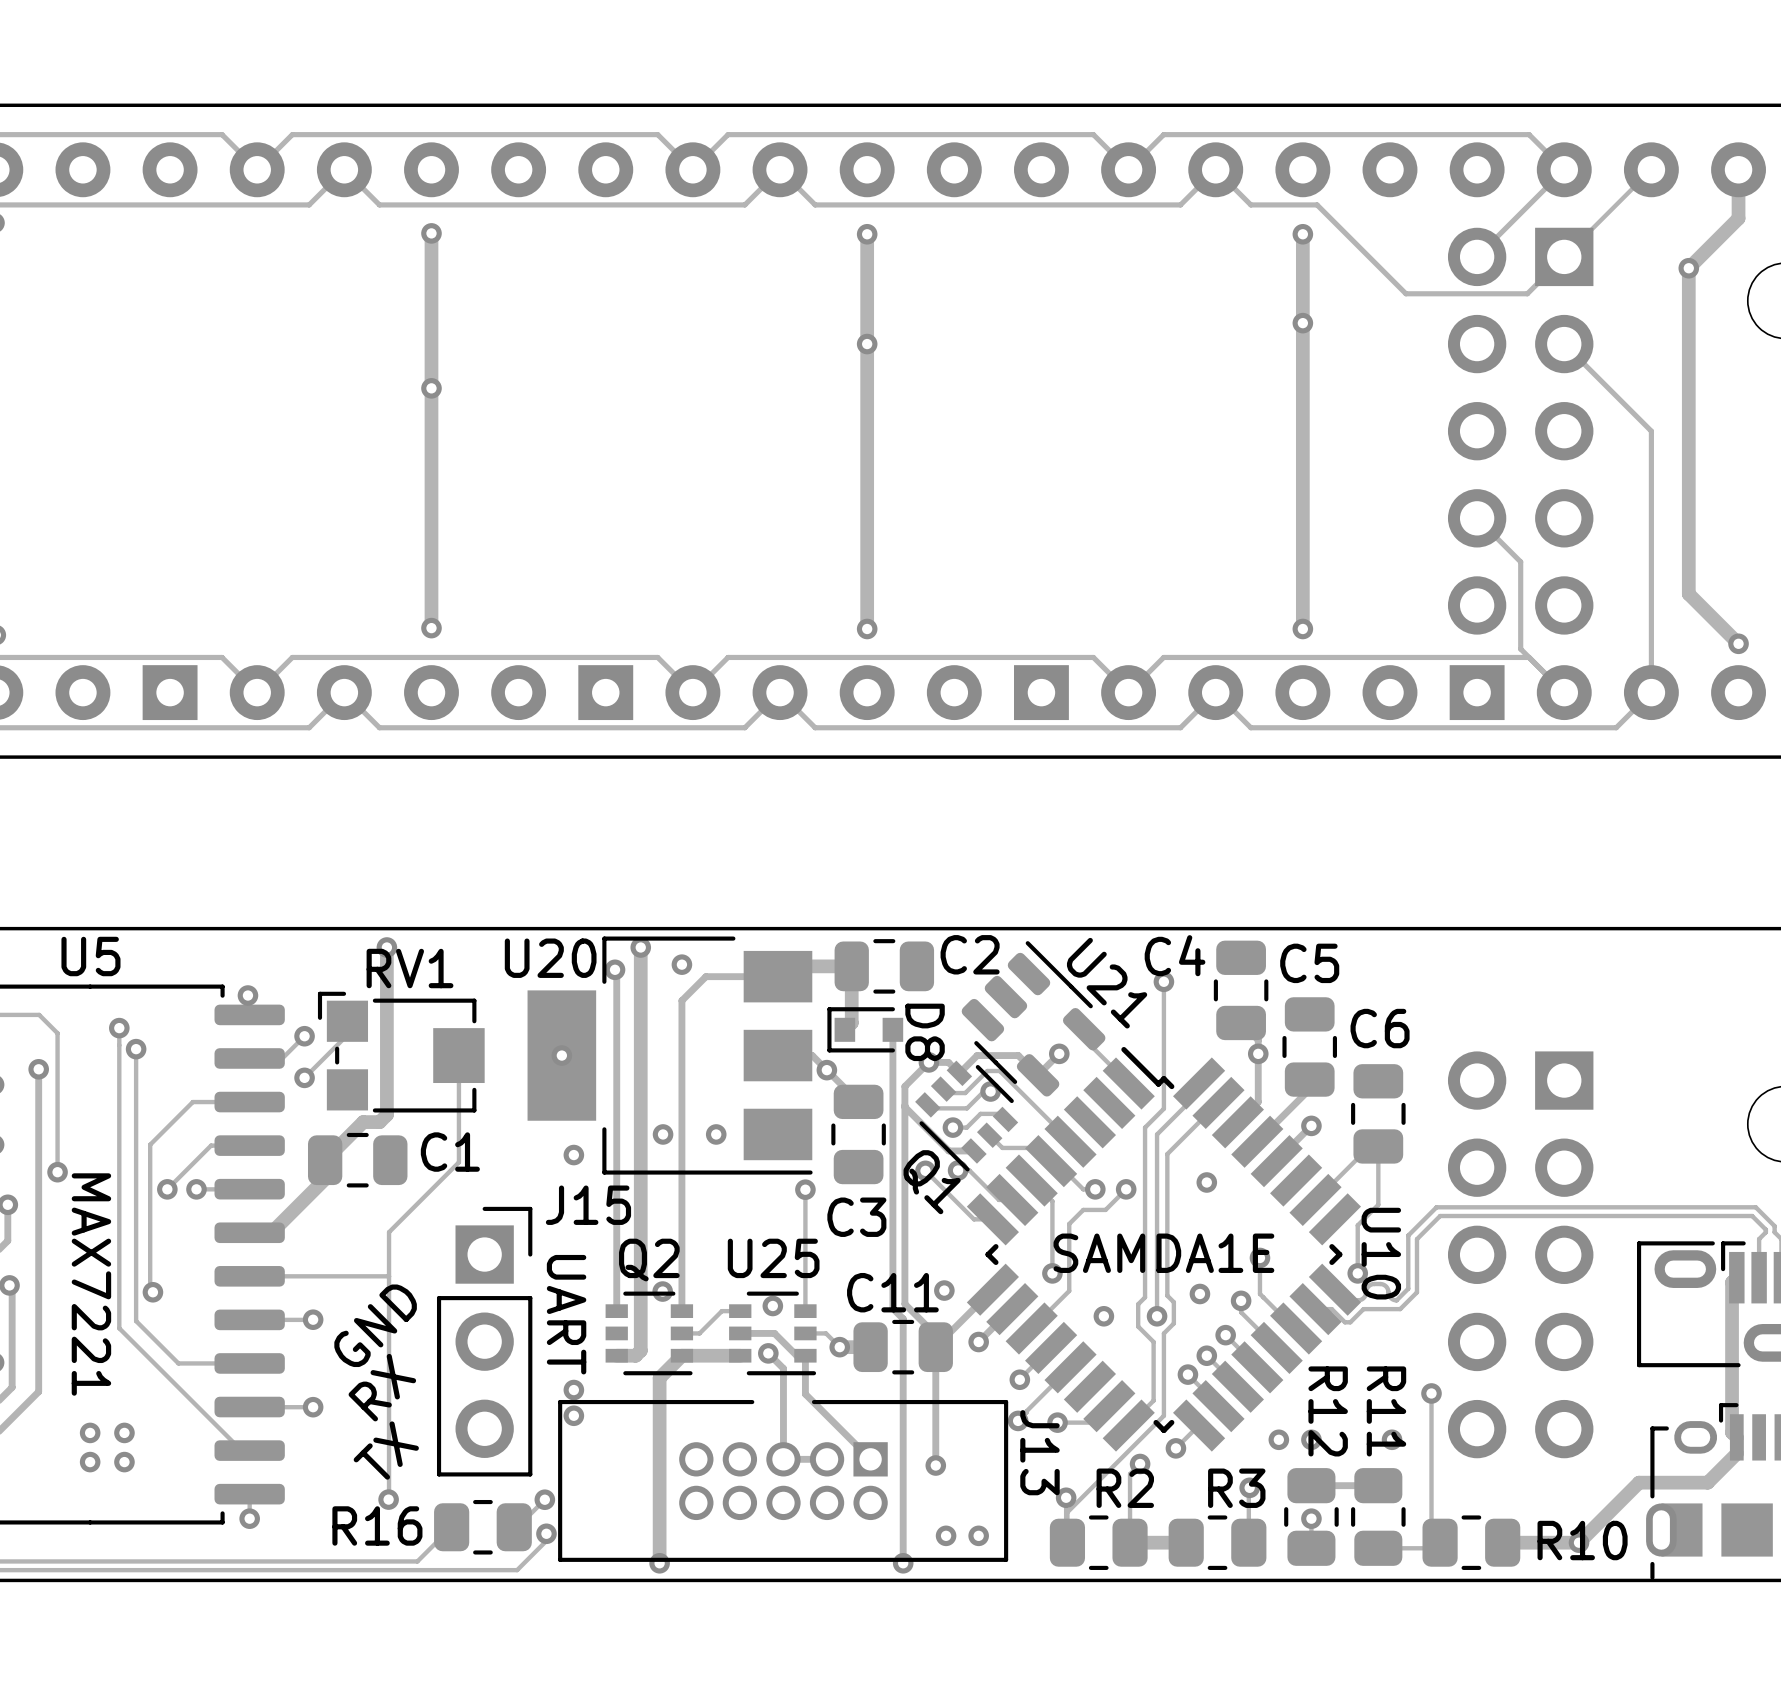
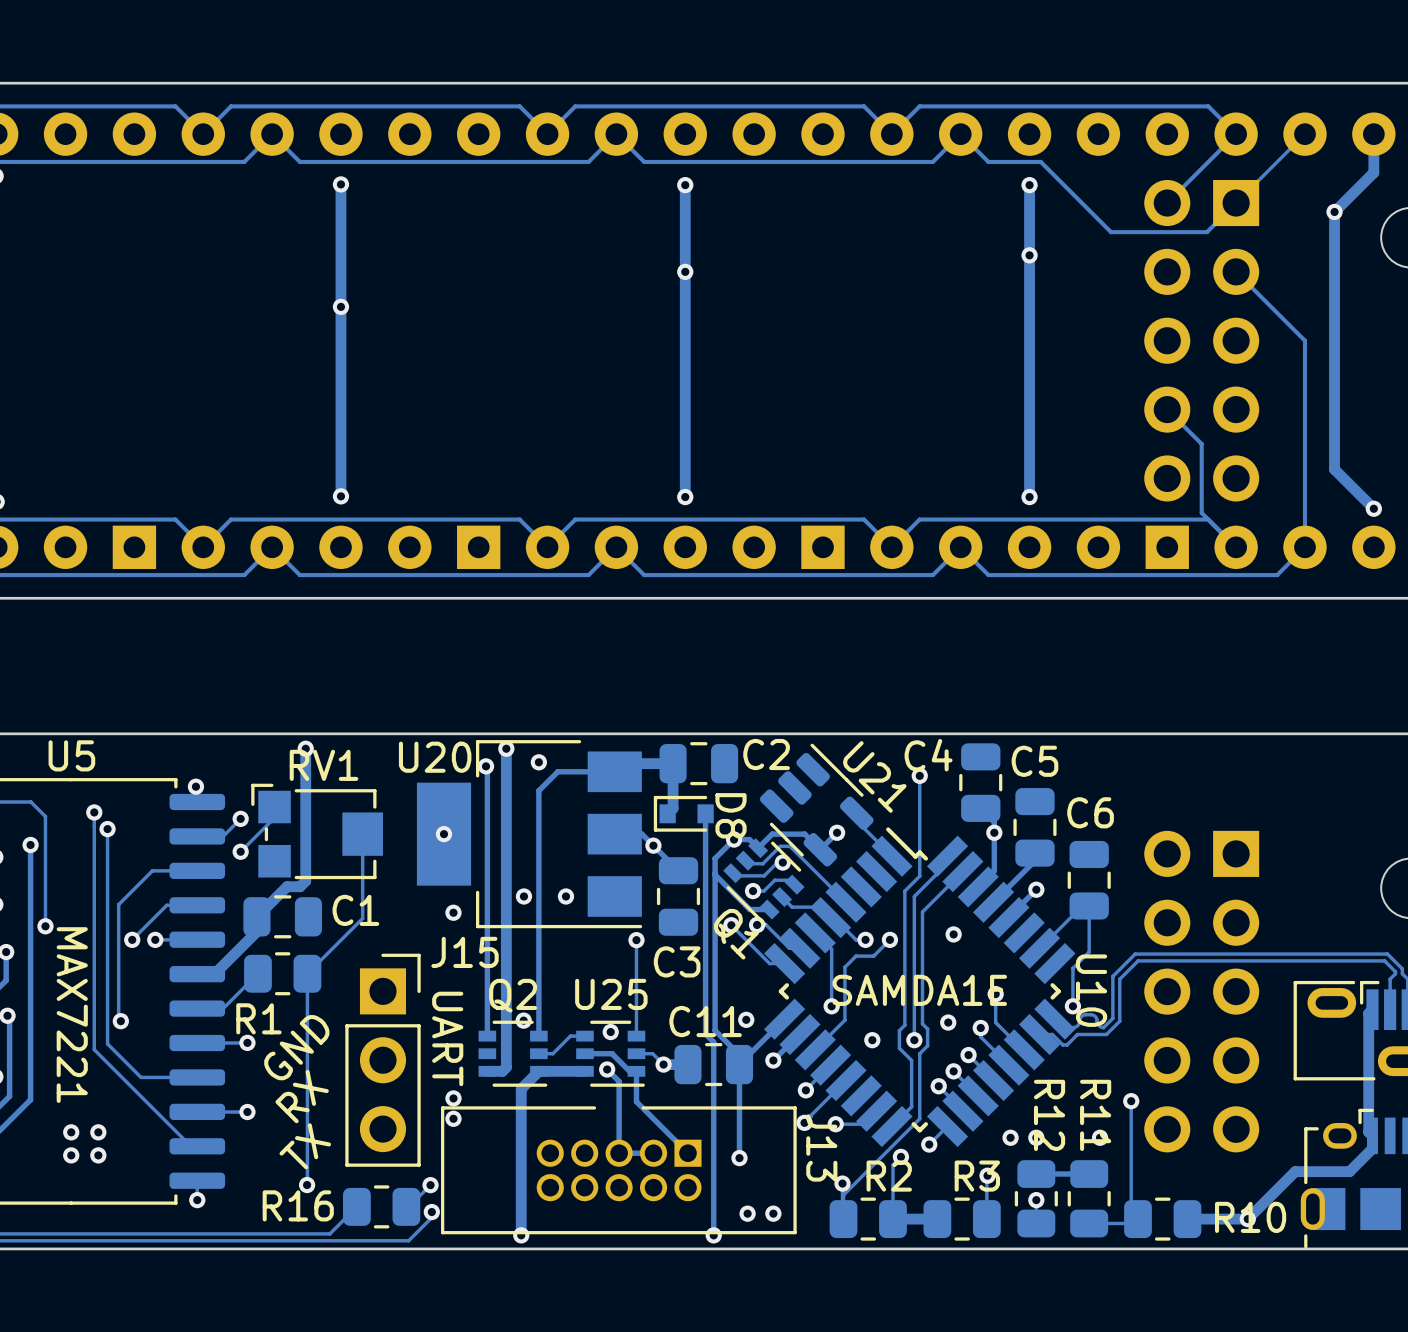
R1: none -> (282, 973)
track: (388, 1276) (282, 1276) -> (257, 973) (223, 1008)

